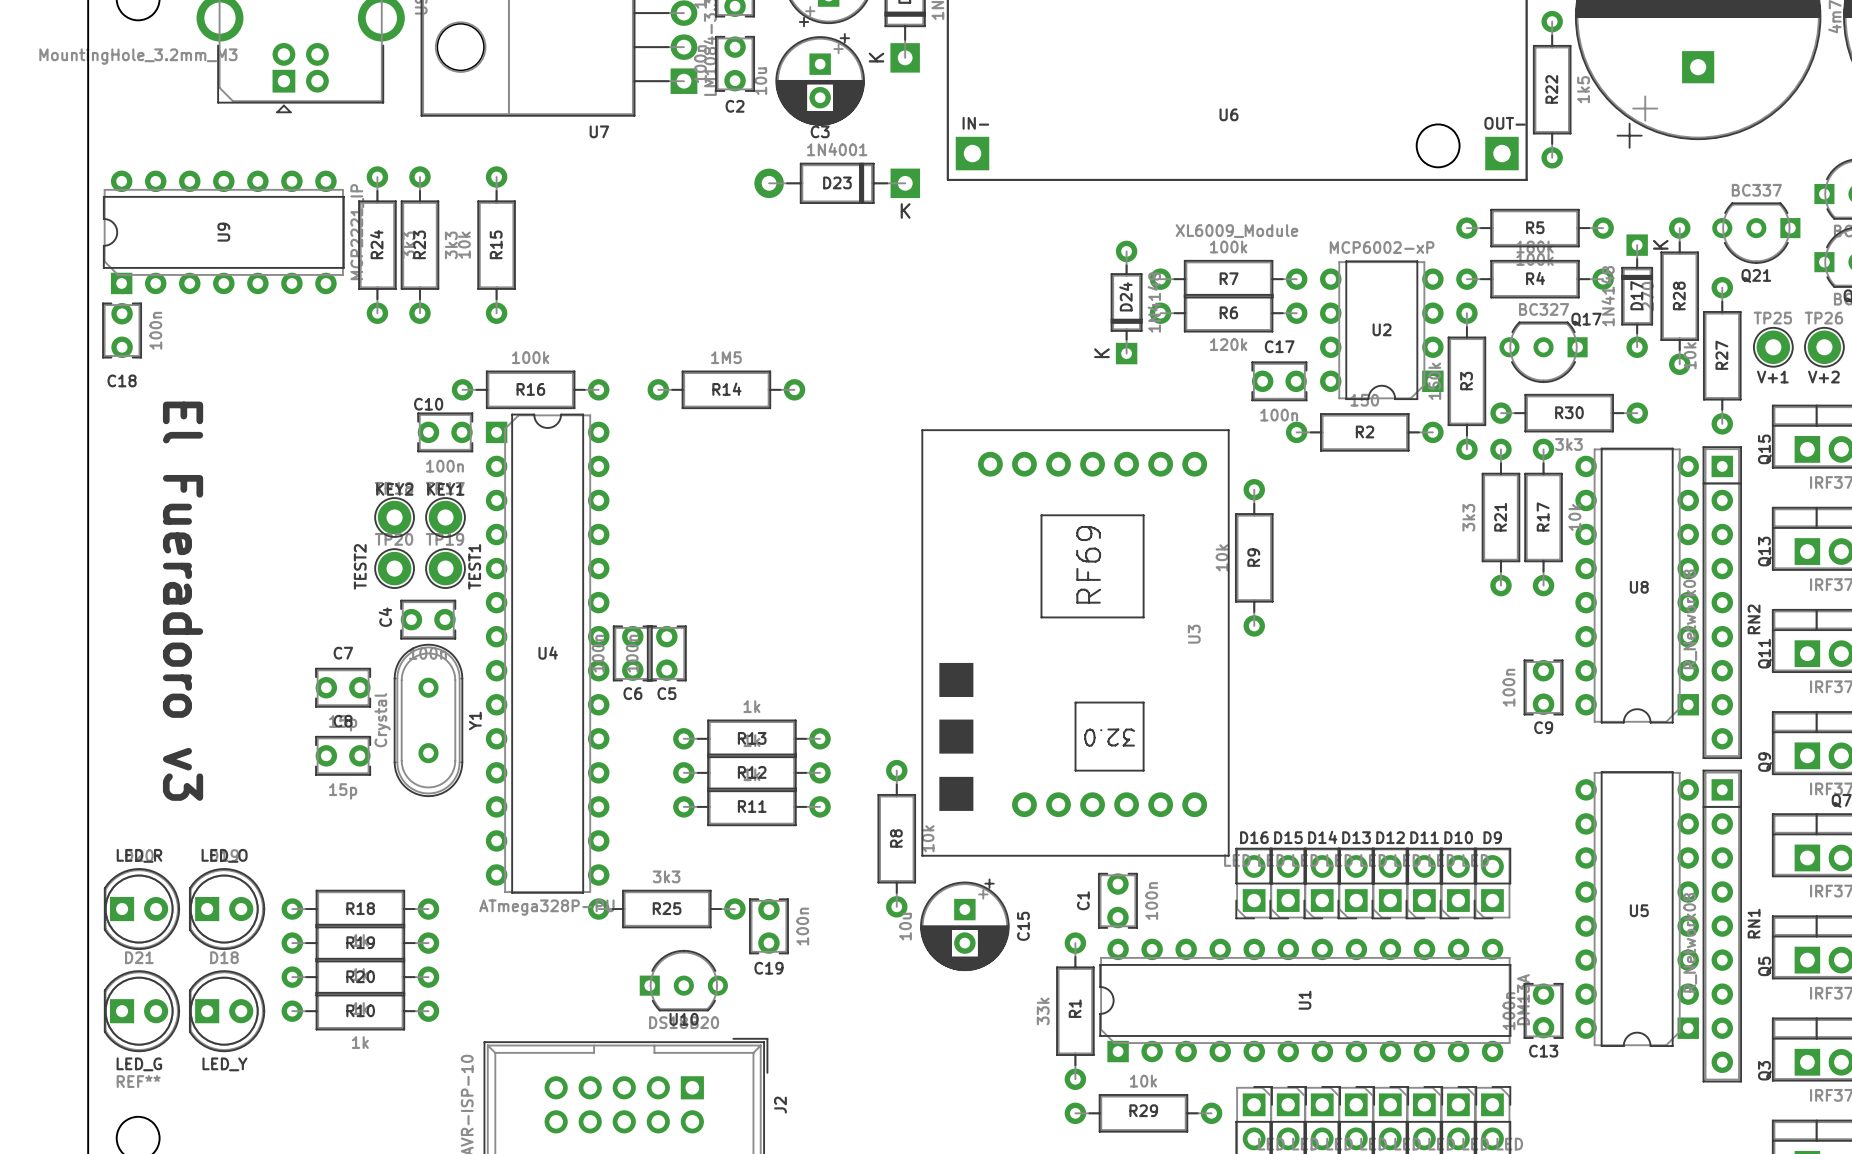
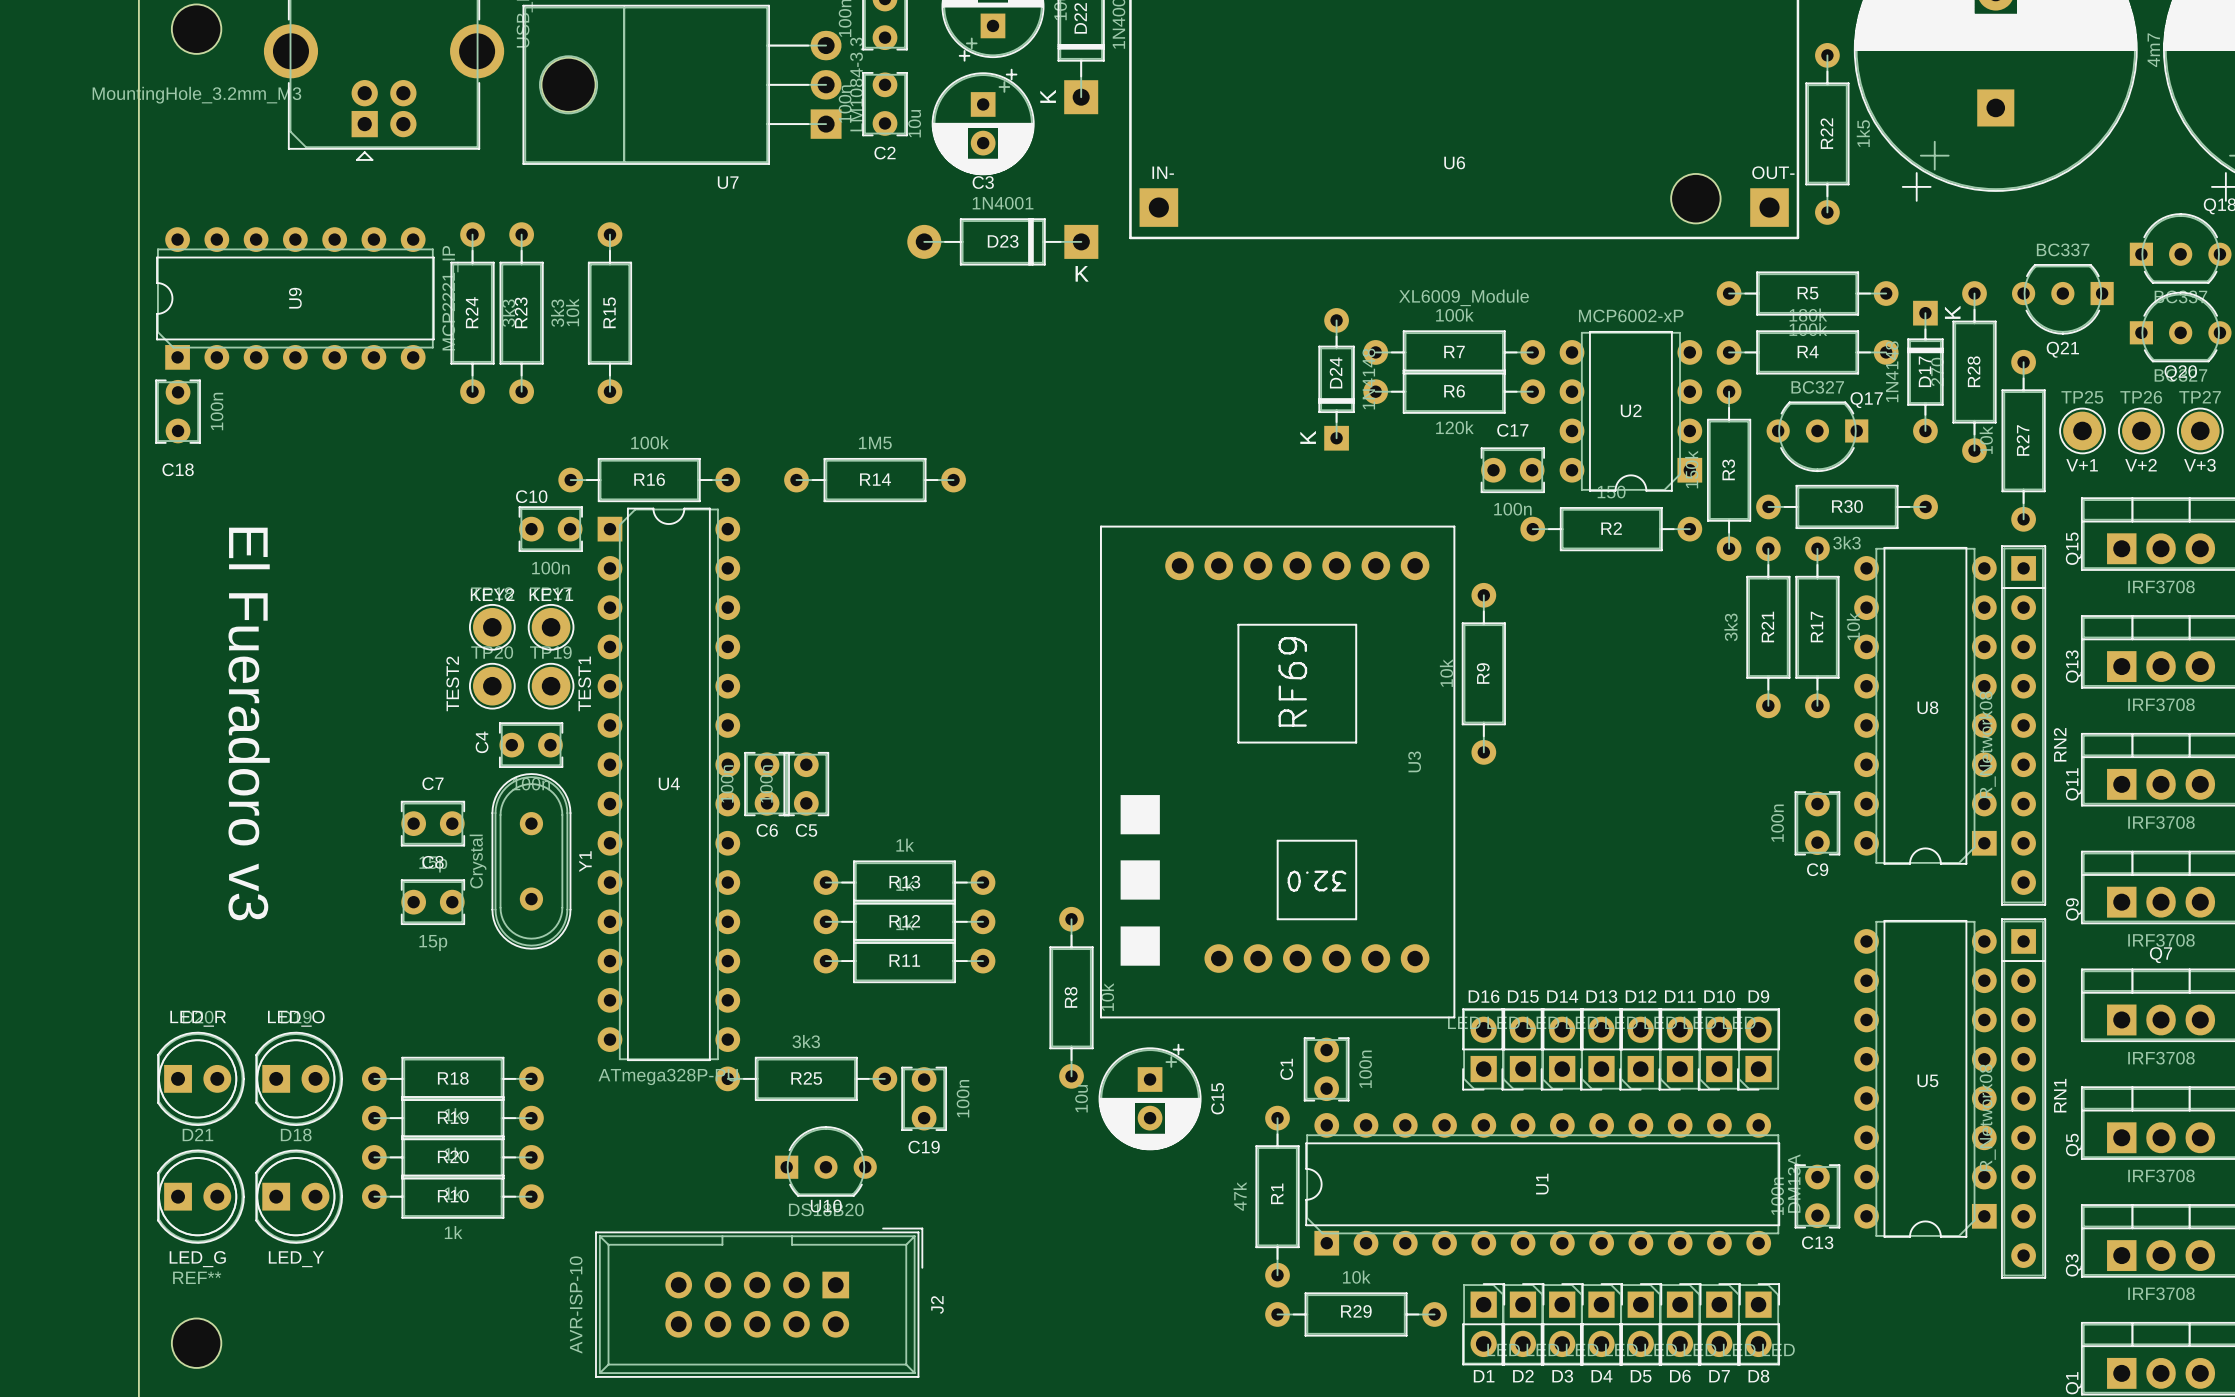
R1 value: 33k (1043, 1011) -> 47k (1240, 1196)

